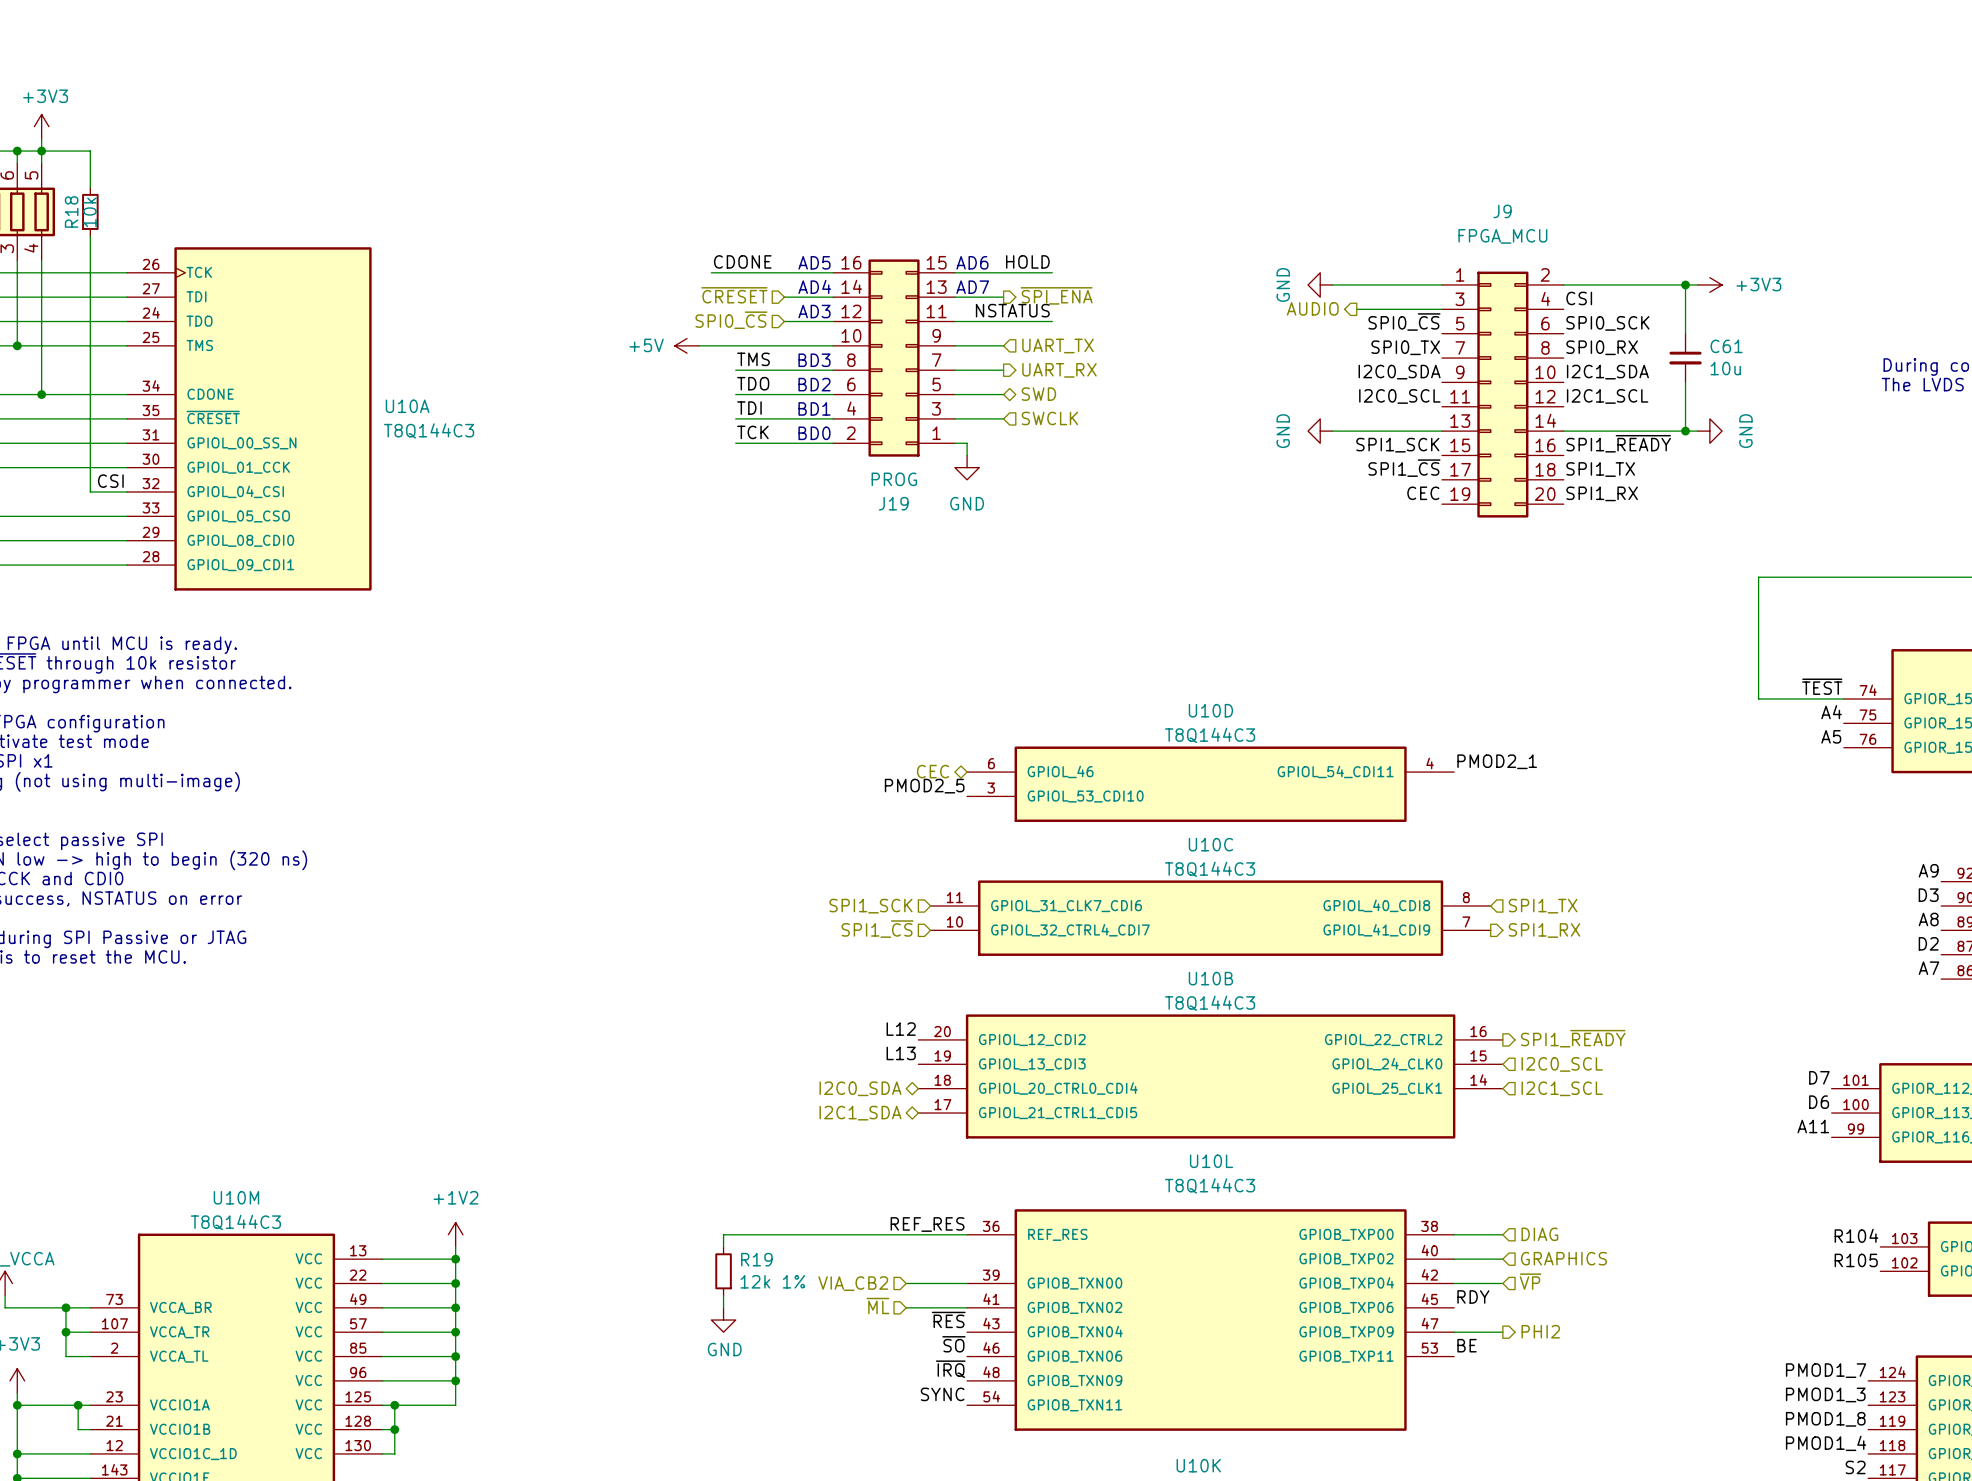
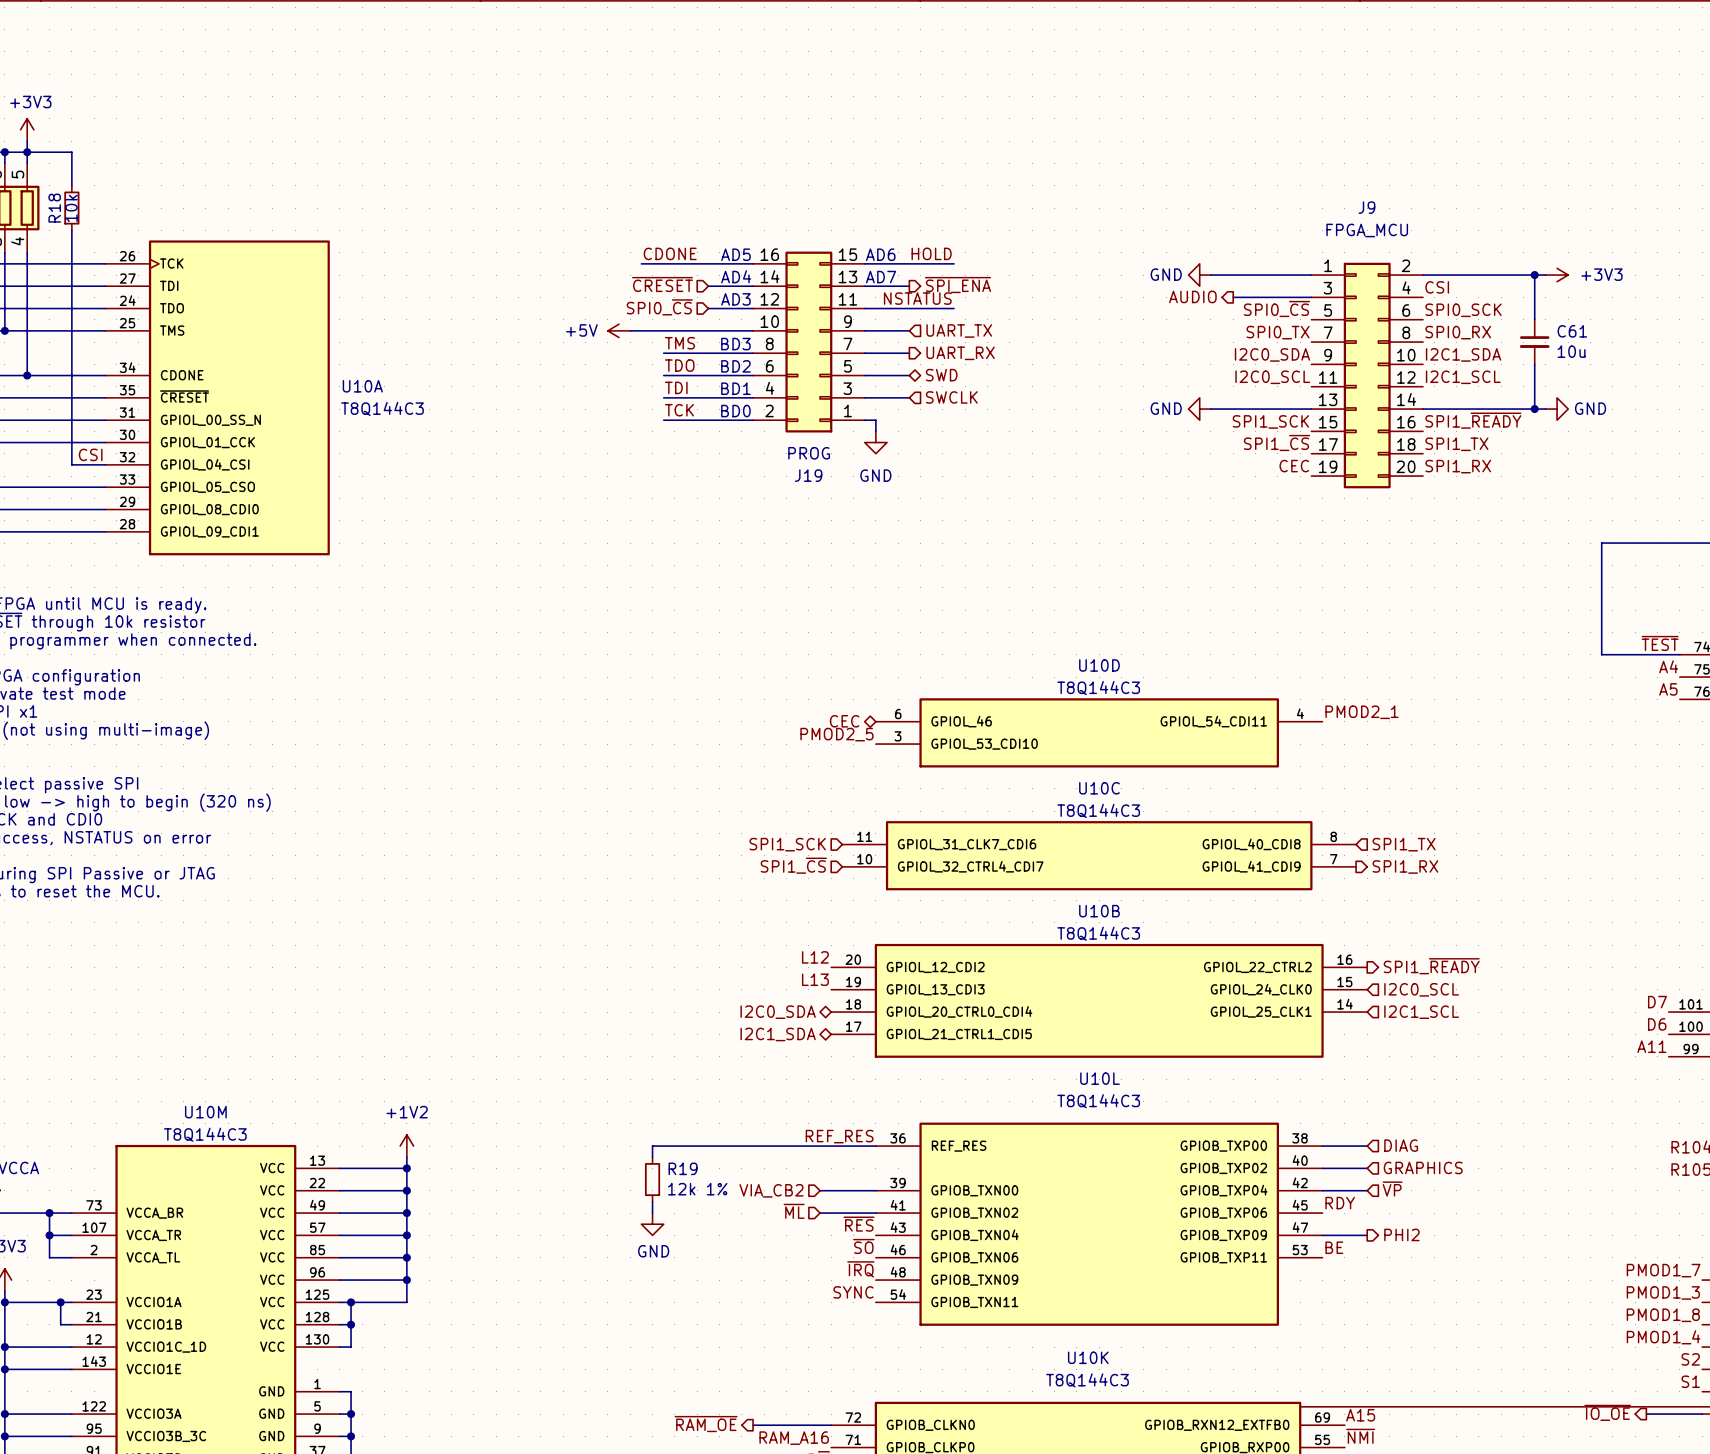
power symbol text rotation: 0° (1283, 284) -> 90° clockwise (1166, 274)
power symbol text rotation: 0° (1283, 431) -> 90° clockwise (1166, 408)
power symbol text rotation: 0° (1745, 431) -> 90° clockwise (1590, 408)

